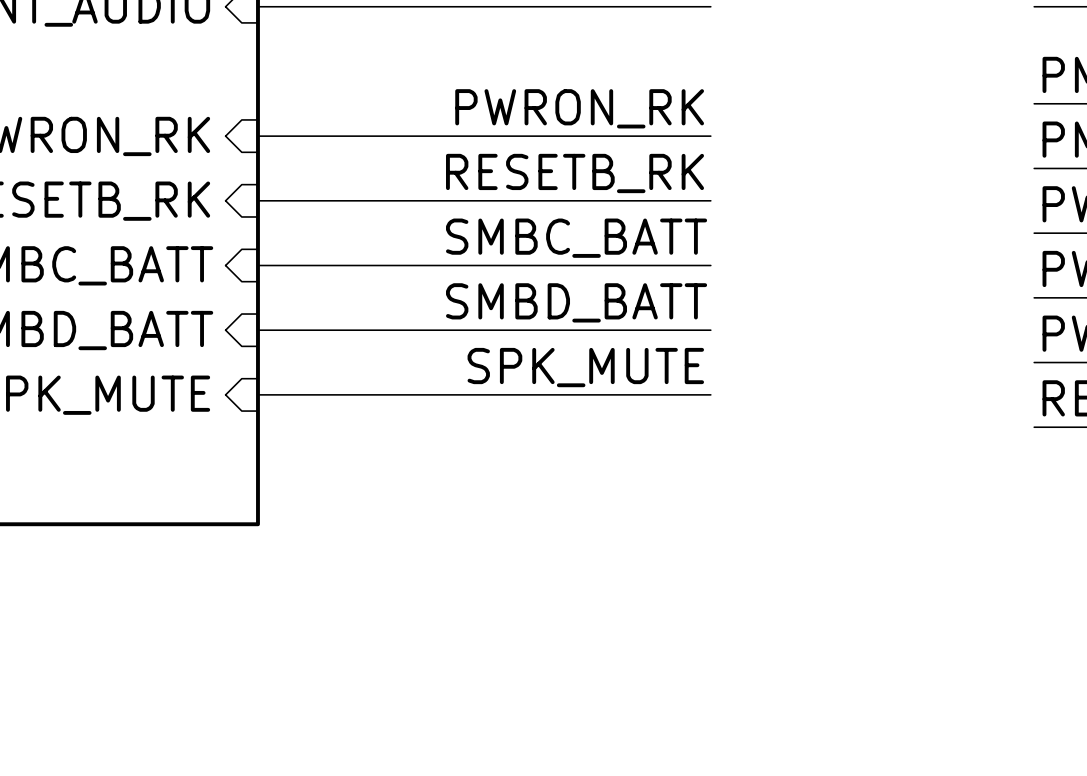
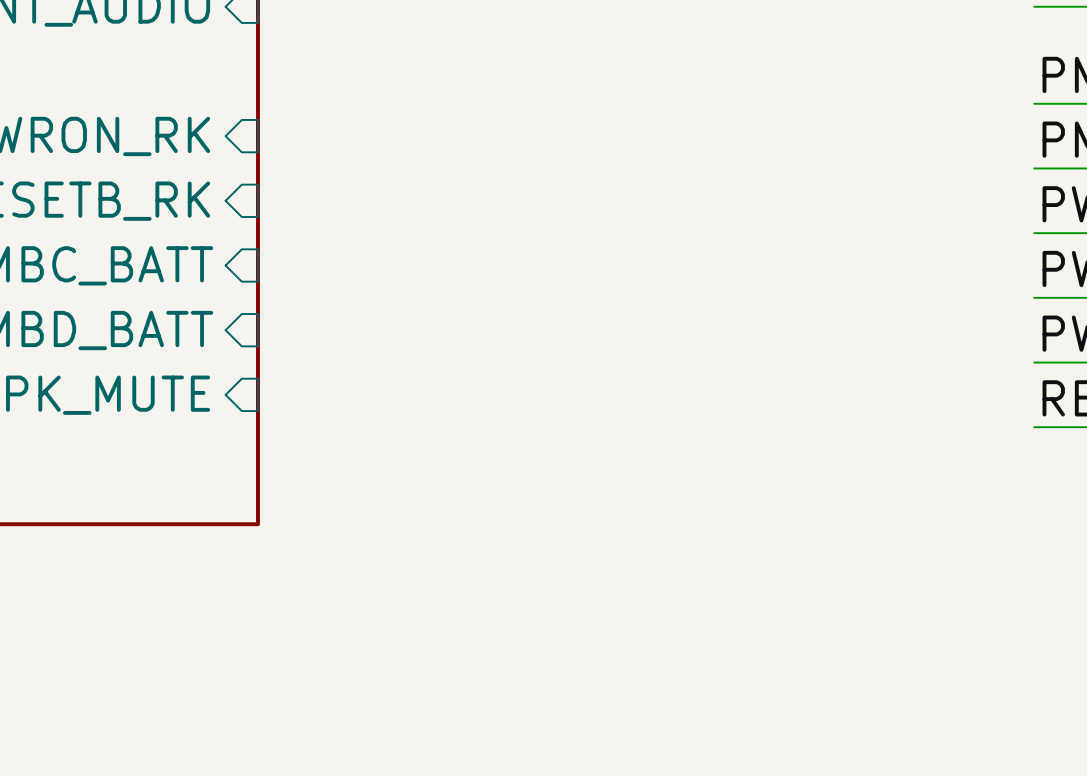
wire: (257, 6) (710, 6) -> none
label: PWRON_RK (579, 108) -> none
wire: (257, 136) (710, 136) -> none
label: RESETB_RK (575, 173) -> none
wire: (257, 200) (710, 200) -> none
label: SMBC_BATT (576, 238) -> none
wire: (257, 265) (710, 265) -> none
label: SMBD_BATT (576, 302) -> none
wire: (257, 330) (710, 330) -> none
label: SPK_MUTE (585, 367) -> none
wire: (257, 394) (710, 394) -> none

